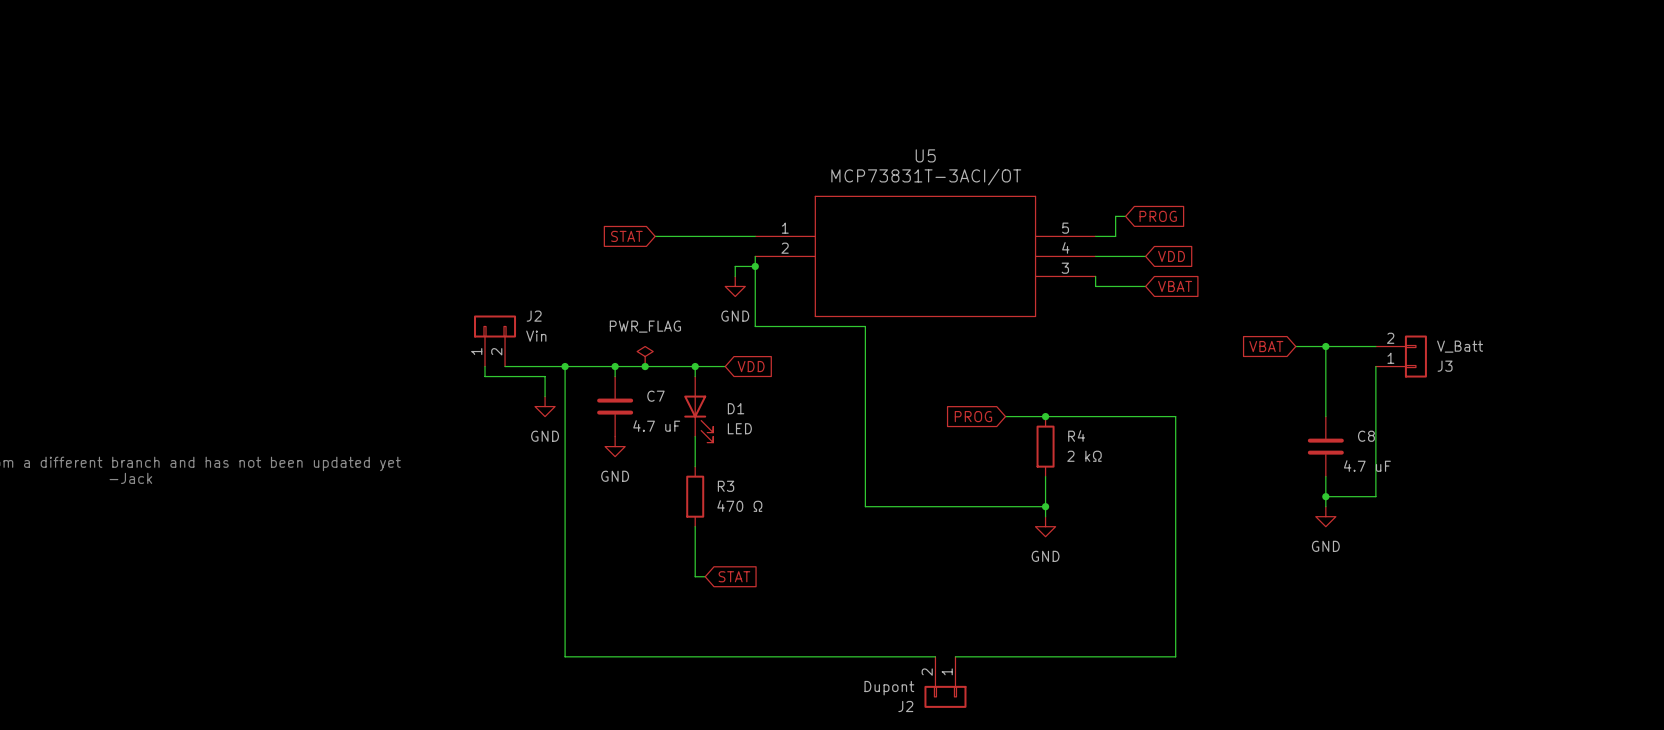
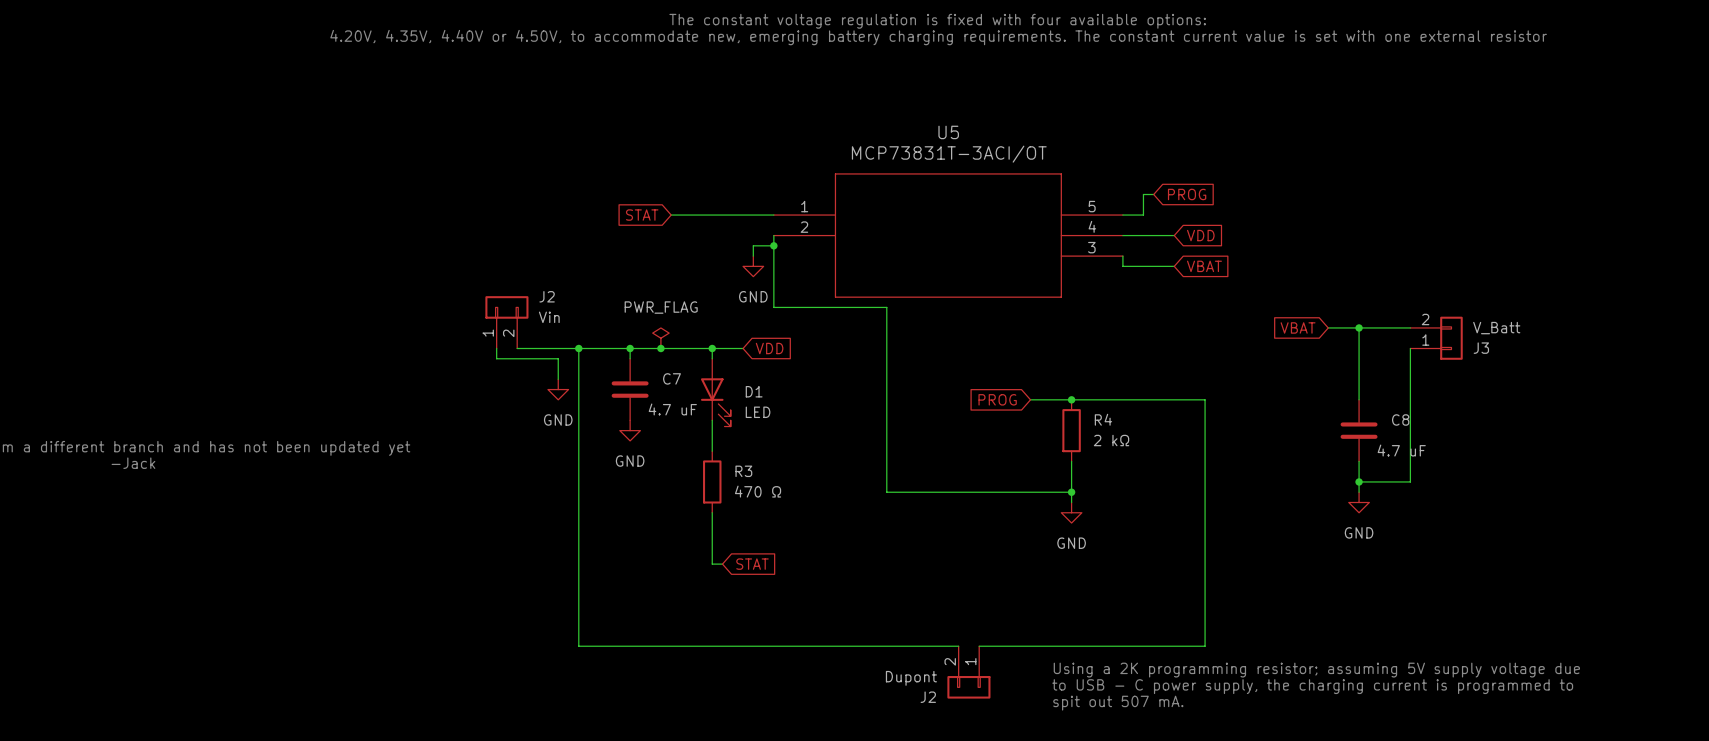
text: none -> The constant voltage regulation is fixed with four available options: (937, 21)
text: none -> 4.20V, 4.35V, 4.40V or 4.50V, to accommodate new, emerging battery charging requirements. The constant current value is set with one external resistor (938, 37)
text: none -> Using a 2K programming resistor; assuming 5V supply voltage due (1316, 670)
text: none -> to USB - C power supply, the charging current is programmed to (1312, 686)
text: none -> spit out 507 mA. (1118, 703)

